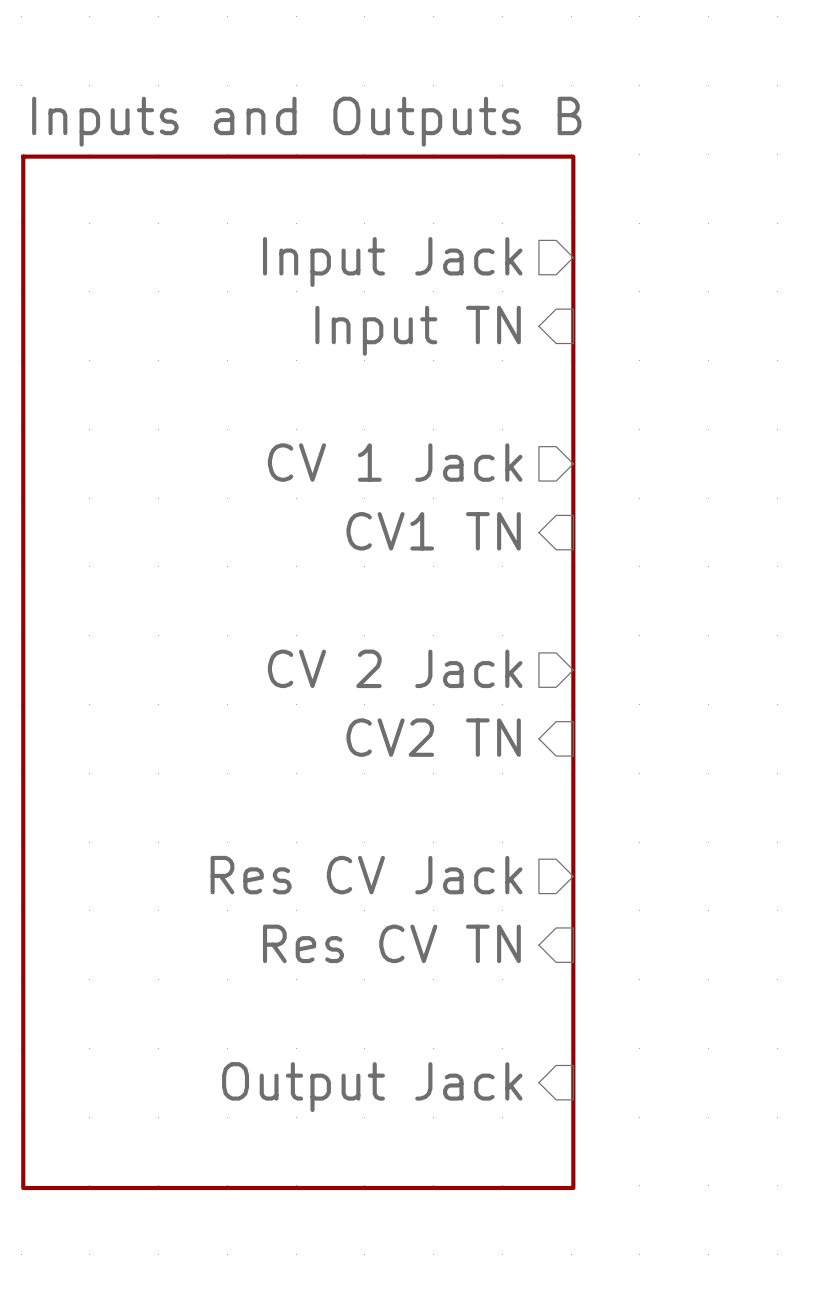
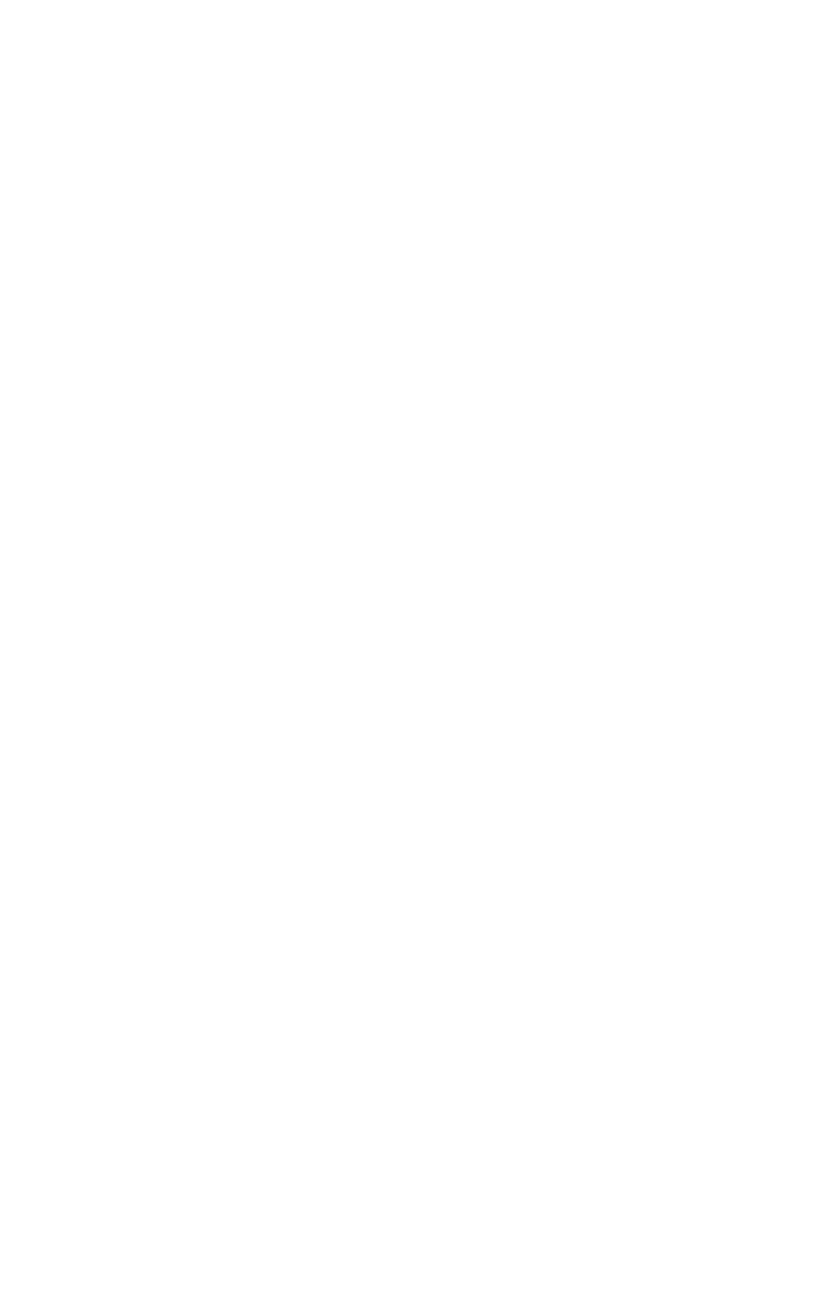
sheet pin: Input Jack (392, 262) -> none
sheet pin: Input TN (418, 330) -> none
sheet pin: CV 1 Jack (395, 462) -> none
sheet pin: CV1 TN (433, 531) -> none
sheet pin: CV 2 Jack (395, 668) -> none
sheet Inputs and Outputs B: (298, 672) -> none
sheet pin: CV2 TN (433, 737) -> none
sheet pin: Res CV Jack (366, 875) -> none
sheet pin: Res CV TN (391, 943) -> none
sheet pin: Output Jack (372, 1087) -> none

